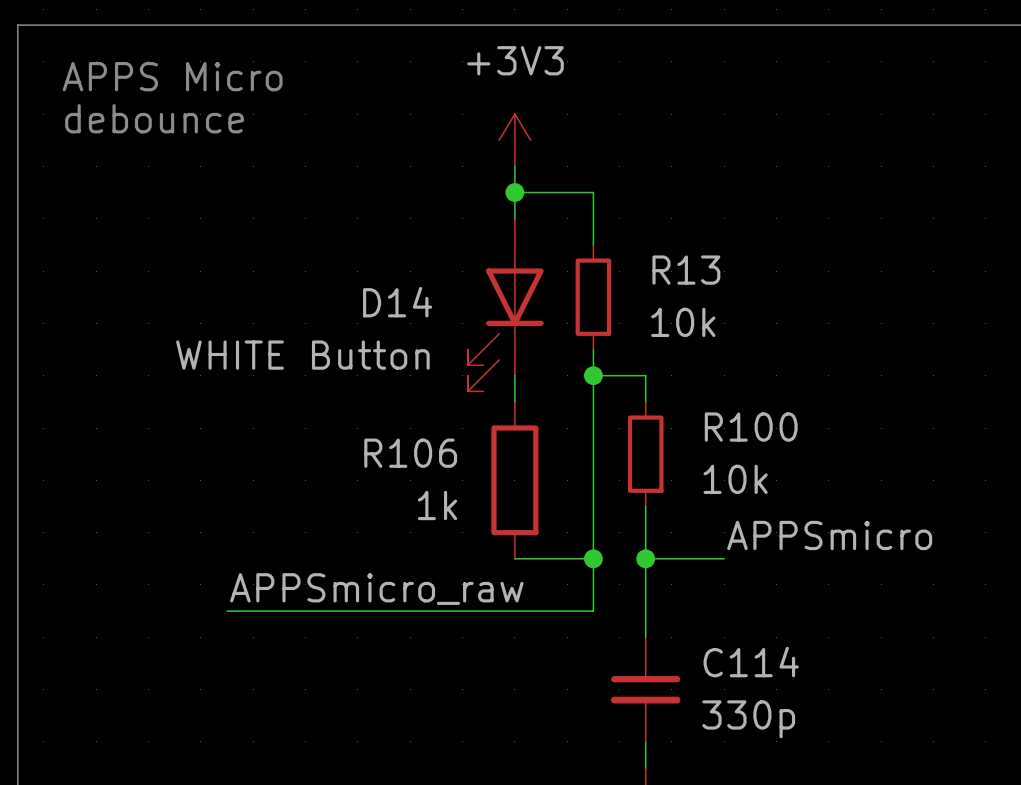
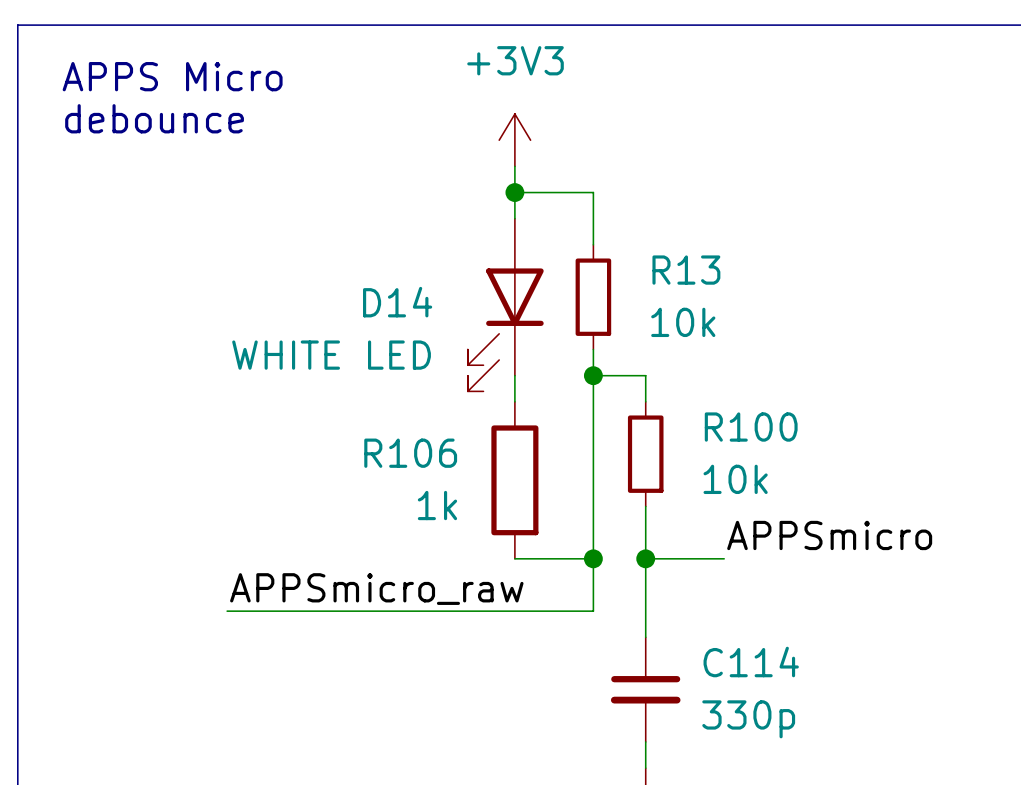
D14 value: WHITE Button (302, 355) -> WHITE LED (331, 355)

